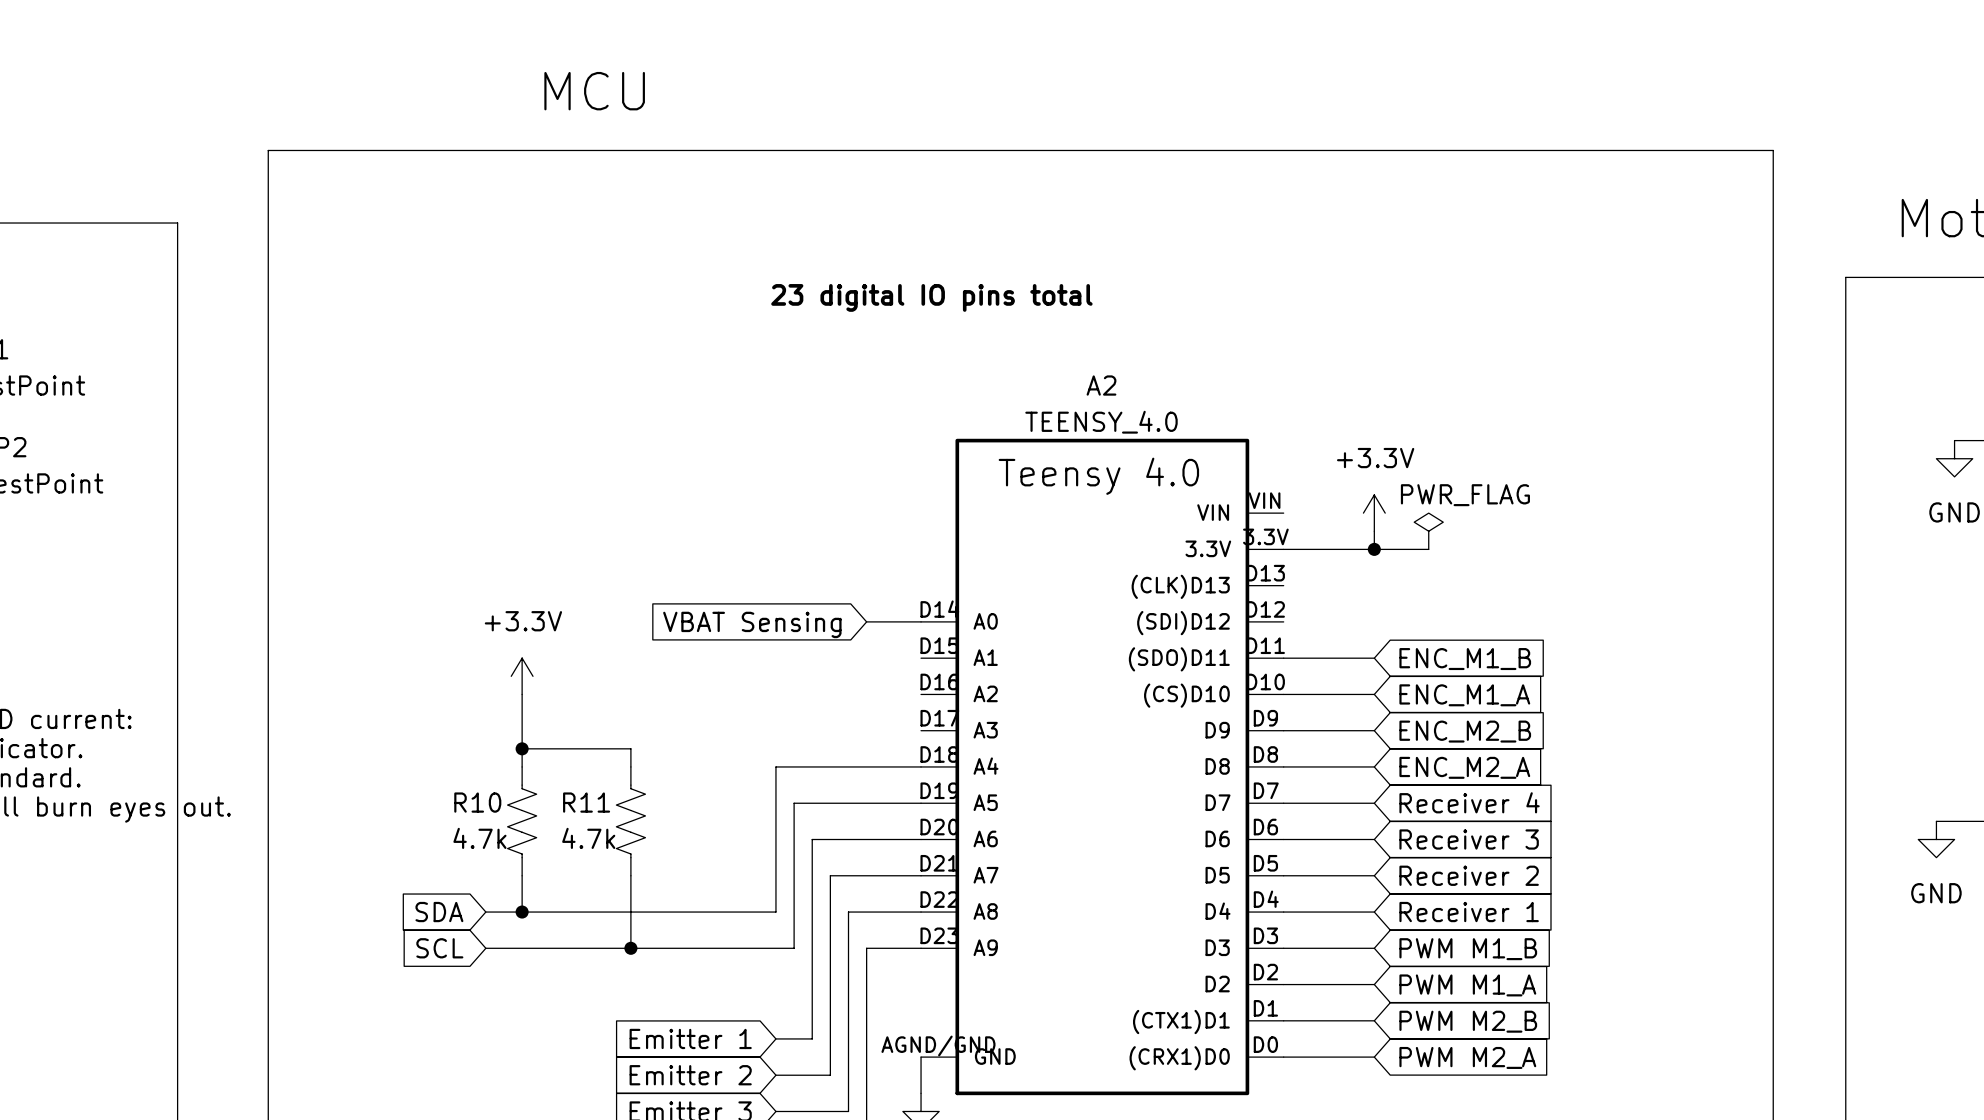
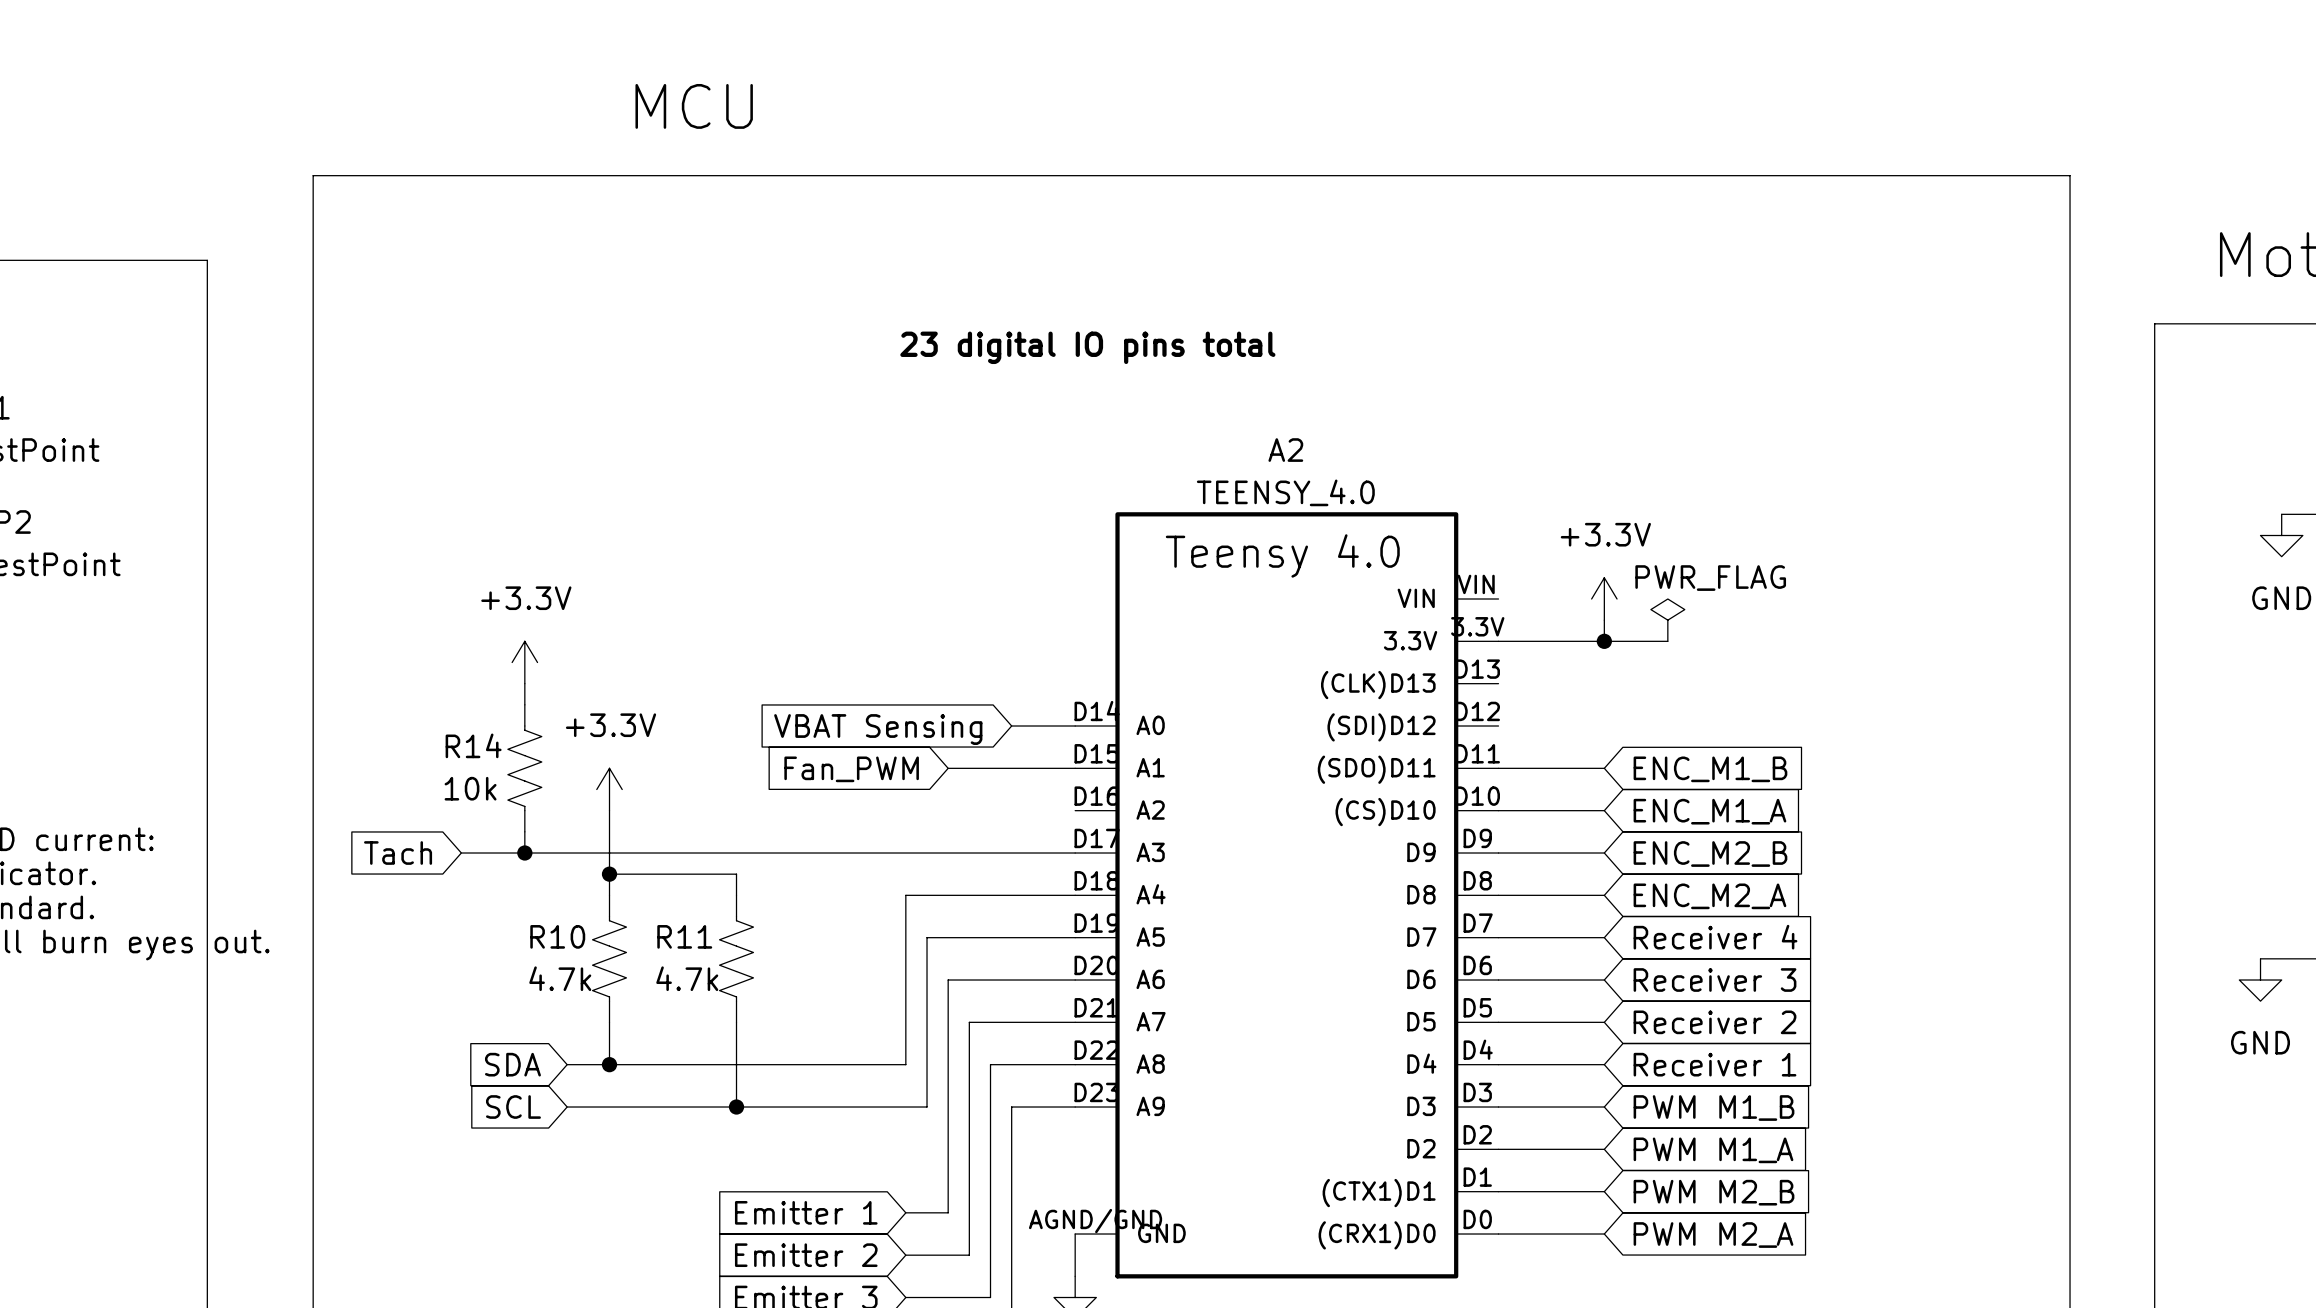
power symbol: none -> +3.3V (524, 662)
wire: none -> (524, 683) (524, 704)
R14: none -> 10k (524, 768)
wire: none -> (948, 768) (1075, 768)
global label: none -> Fan_PWM (851, 769)
wire: none -> (524, 831) (524, 853)
global label: none -> Tach (398, 853)
wire: none -> (461, 853) (1075, 853)
junction: none -> (524, 853)

